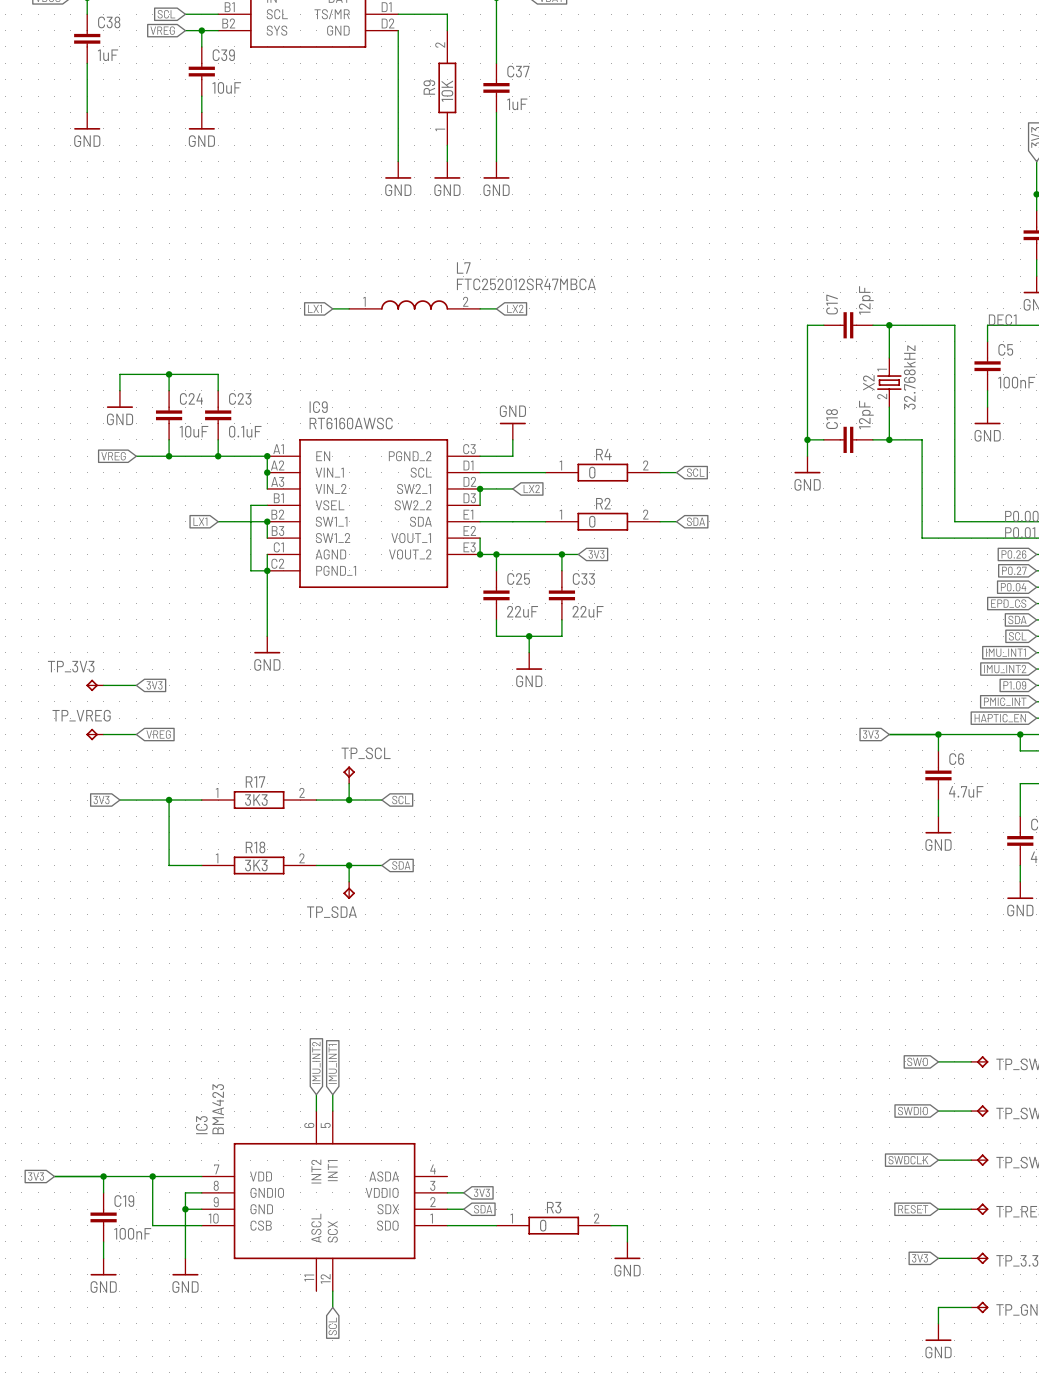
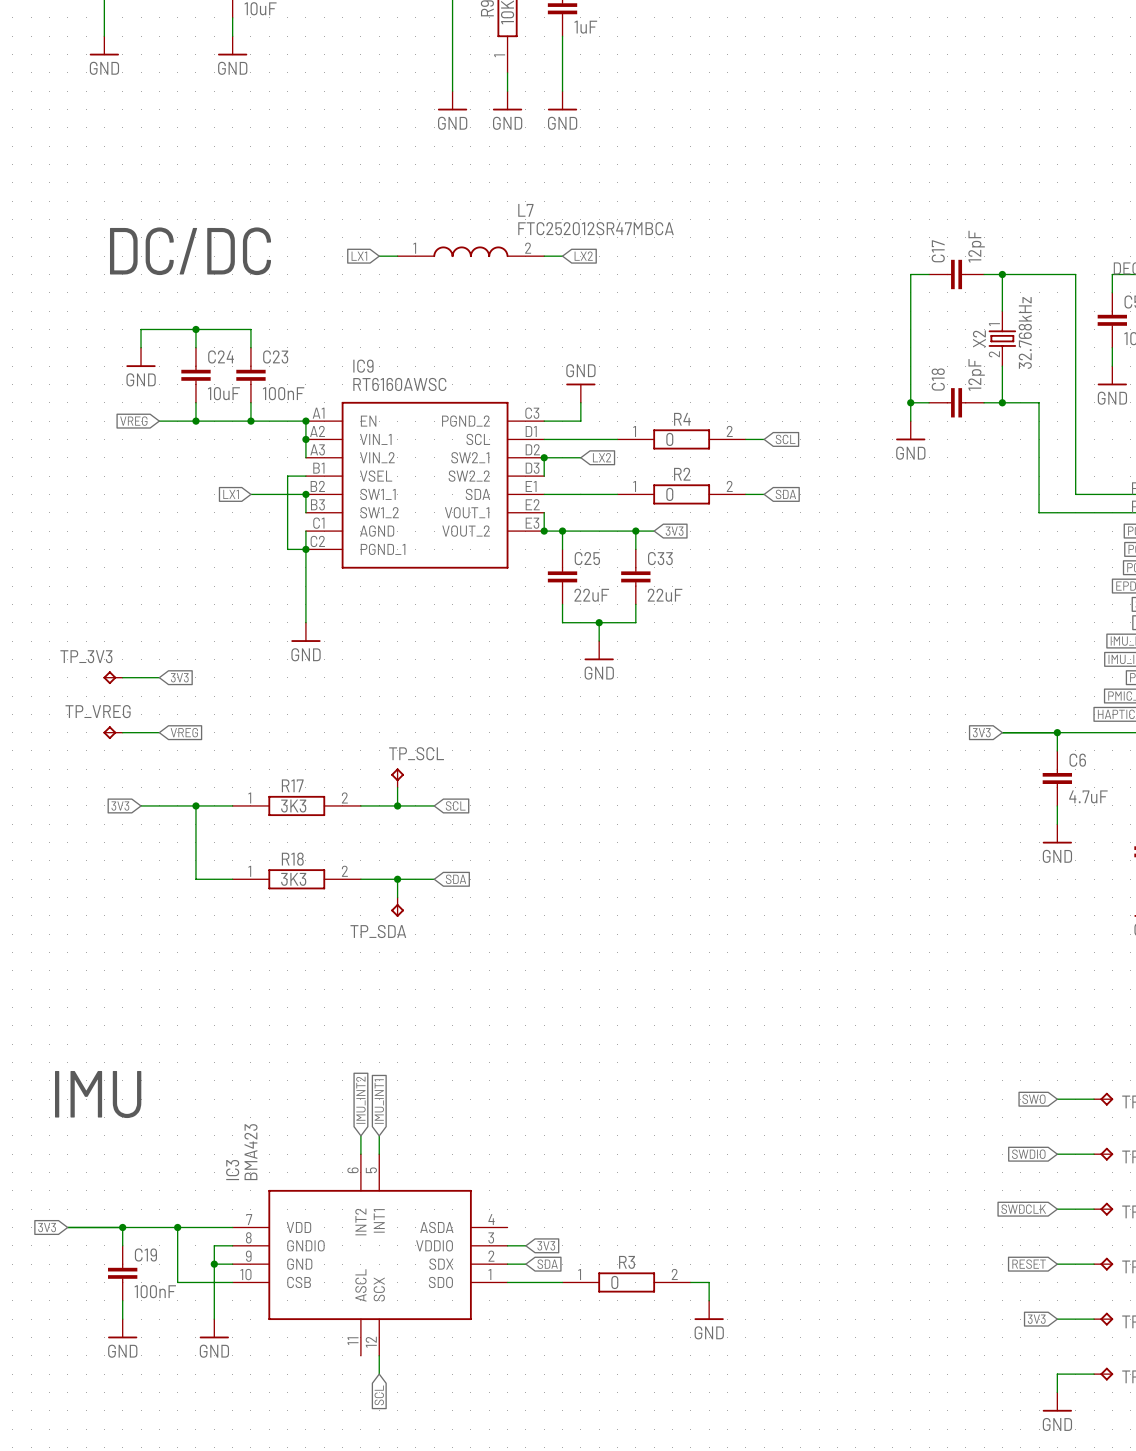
text: none -> DC/DC (190, 251)
C23 value: 0.1uF (245, 431) -> 100nF (283, 393)
text: none -> IMU (98, 1094)

